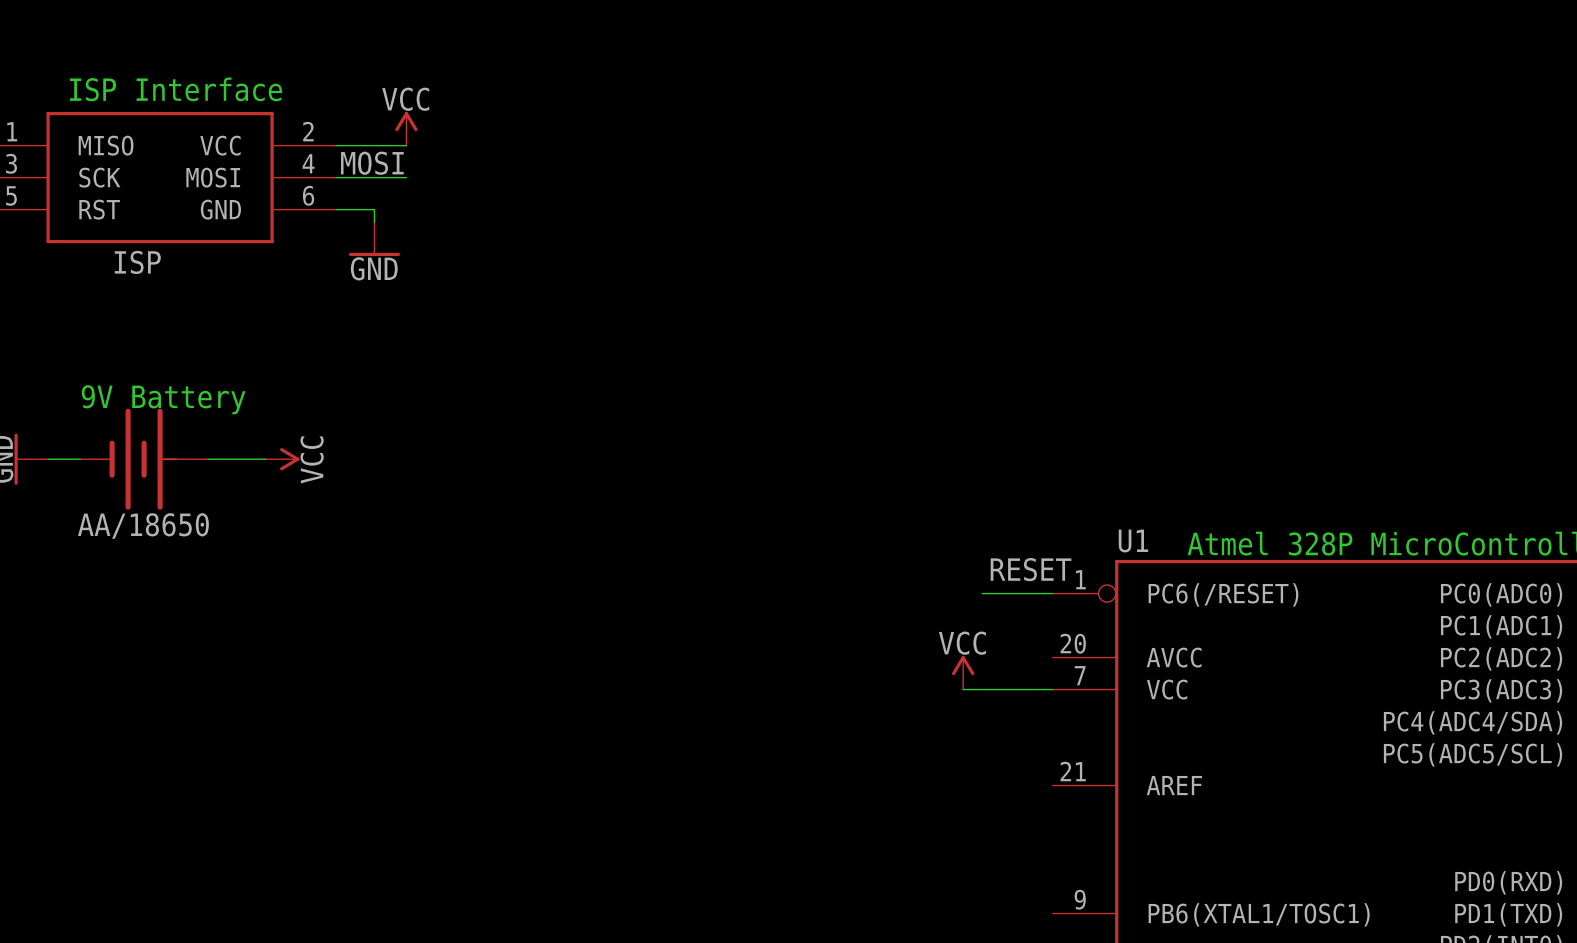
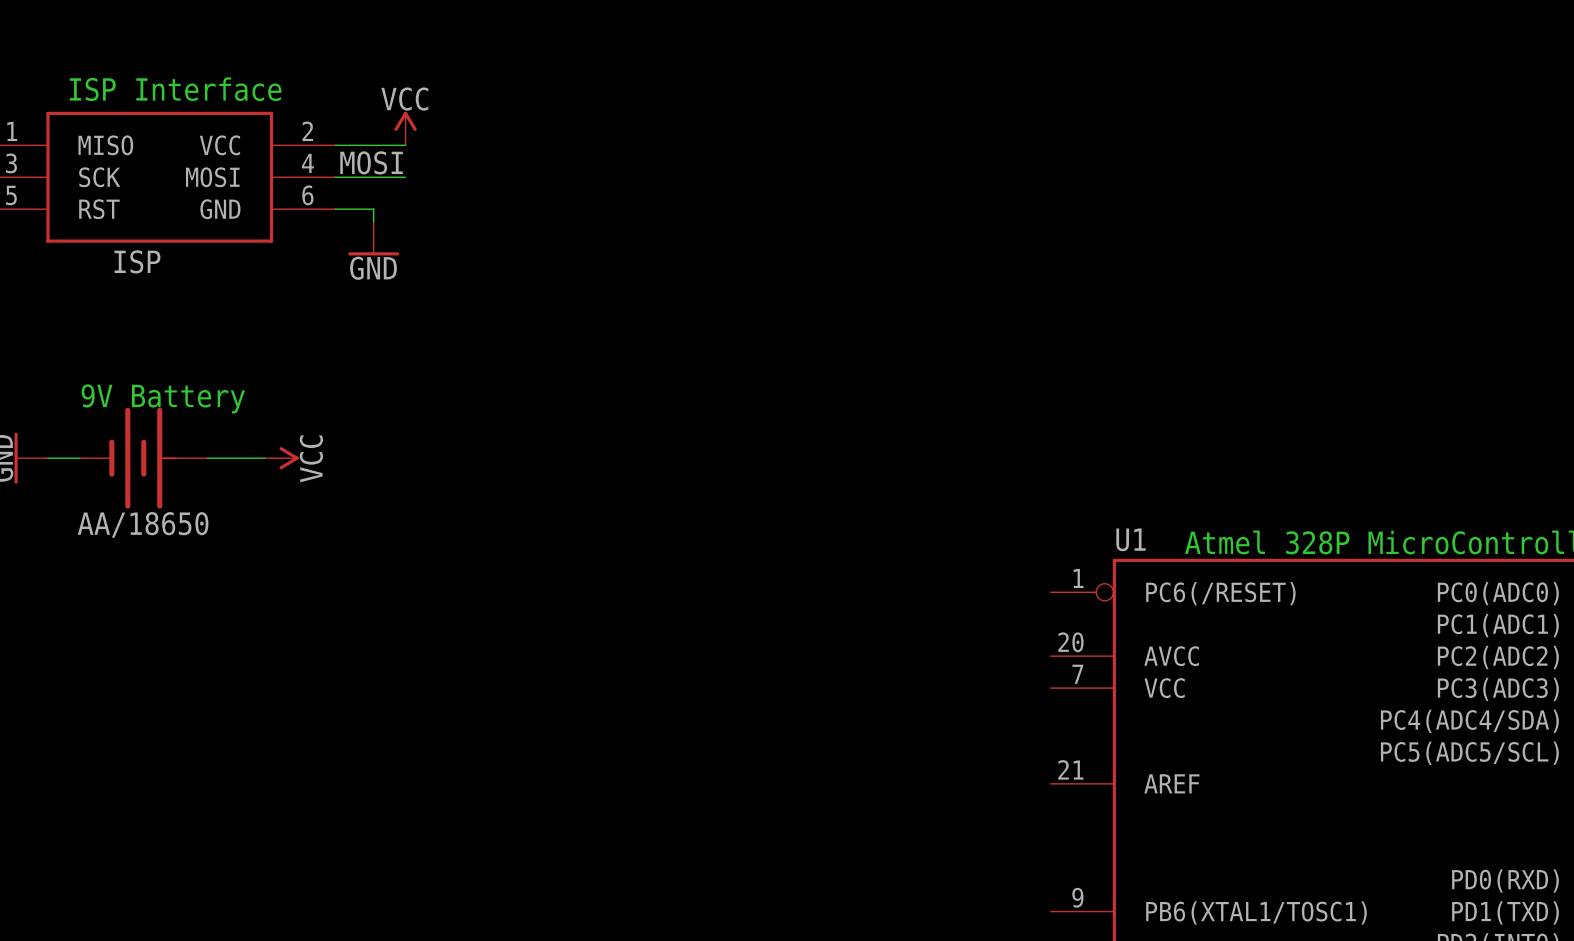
label: RESET (1031, 569) -> none
wire: (982, 593) (1052, 593) -> none
power symbol: VCC (963, 672) -> none
wire: (963, 689) (1052, 689) -> none

